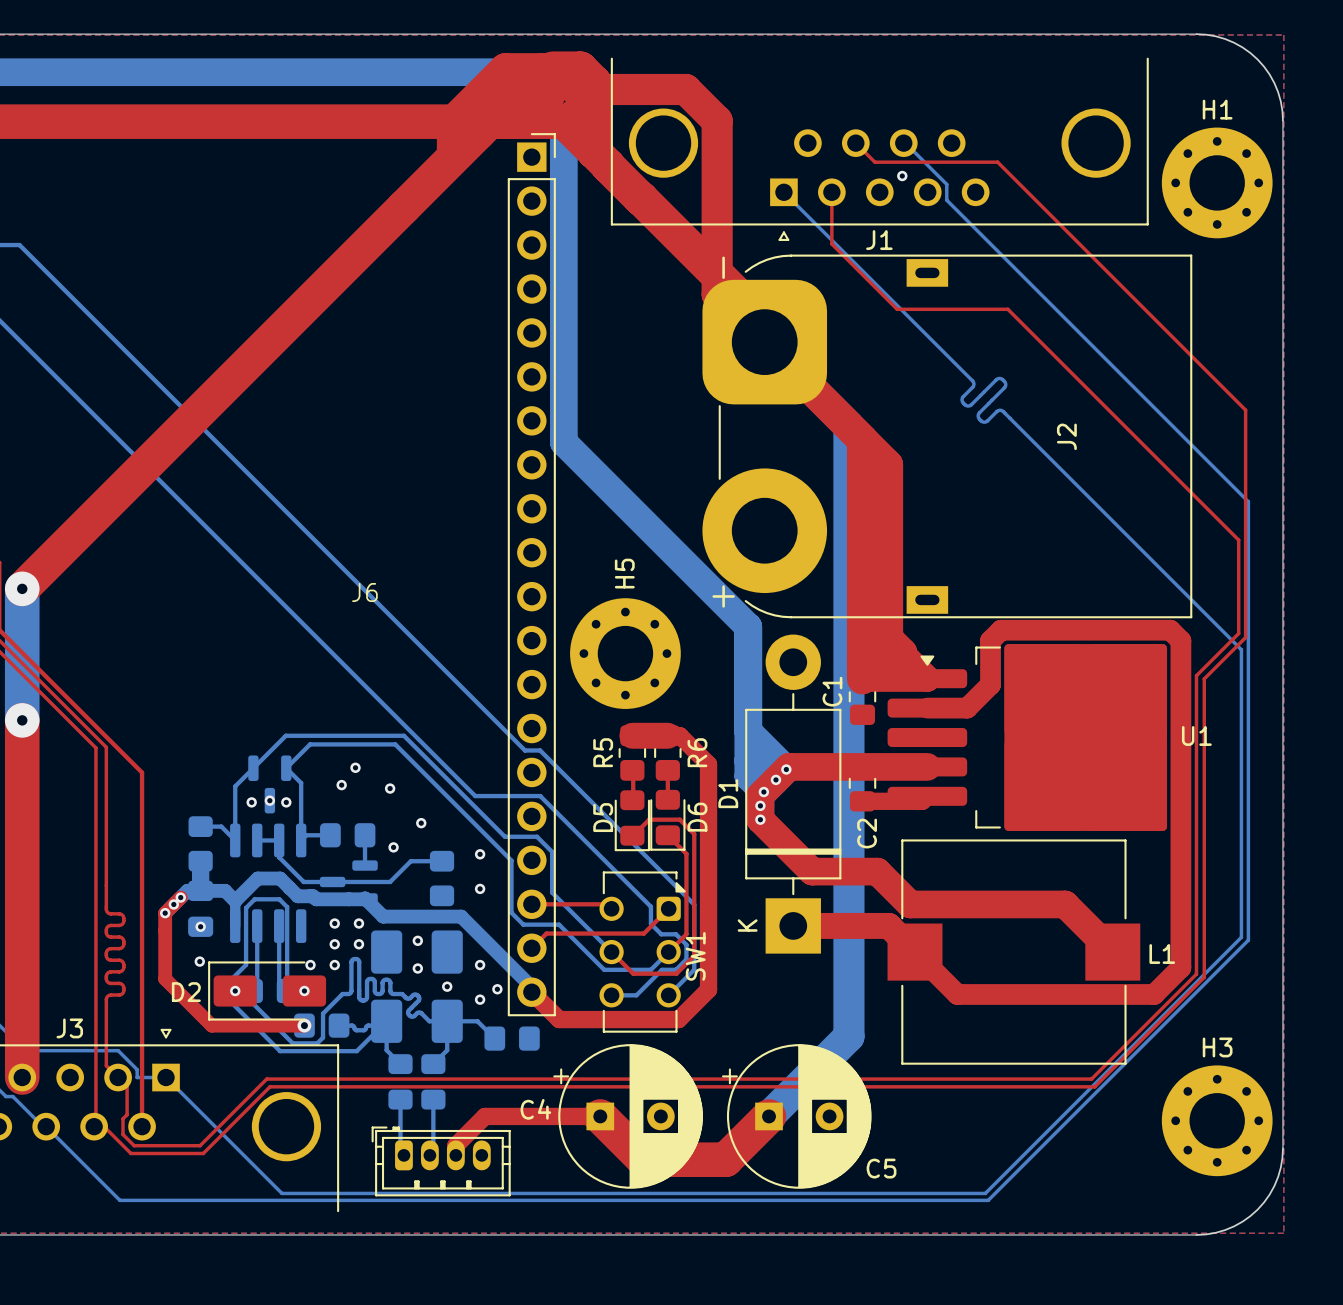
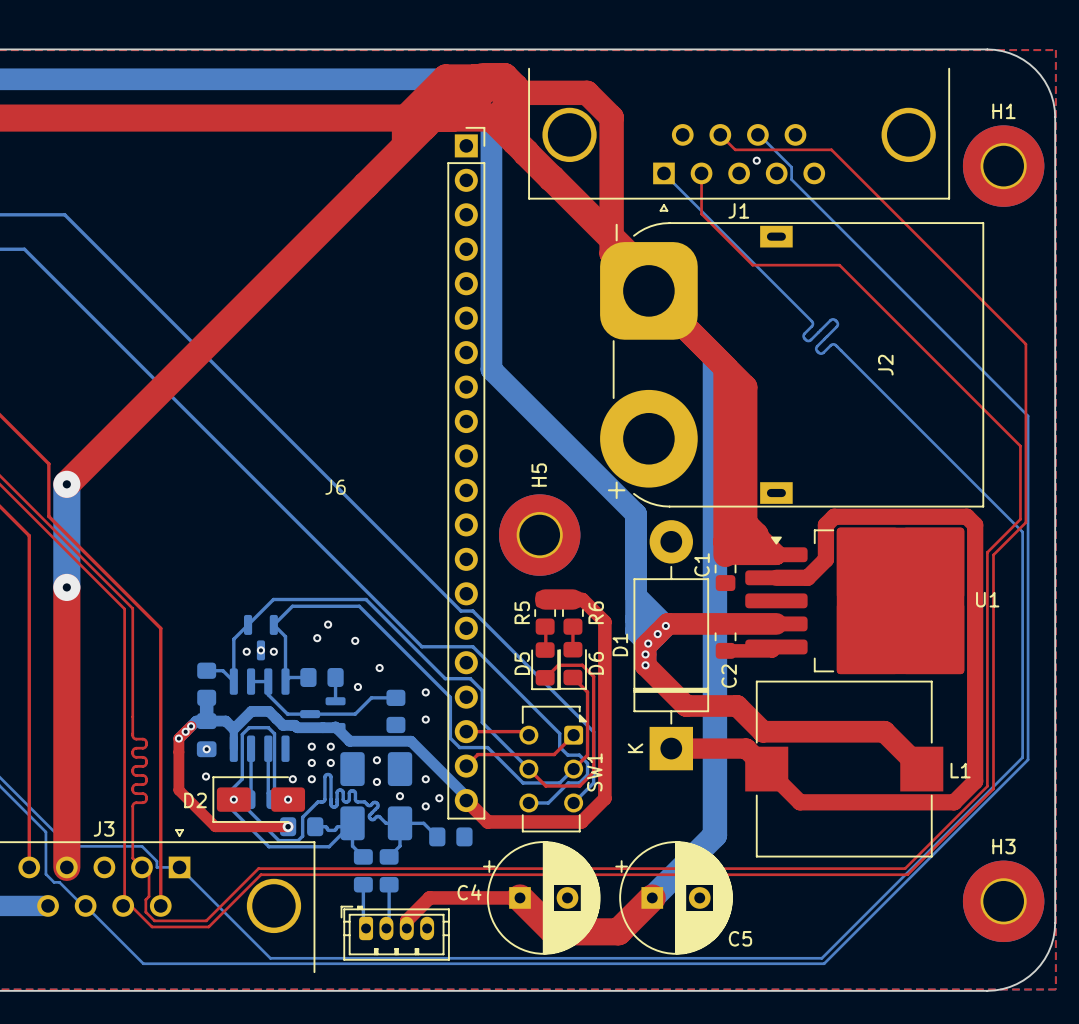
H1 footprint: [1161, 127, 1273, 239] -> [962, 125, 1045, 207]
H5 footprint: [570, 598, 681, 709] -> [499, 494, 581, 576]
H3 footprint: [1161, 1065, 1273, 1177] -> [962, 860, 1045, 943]

